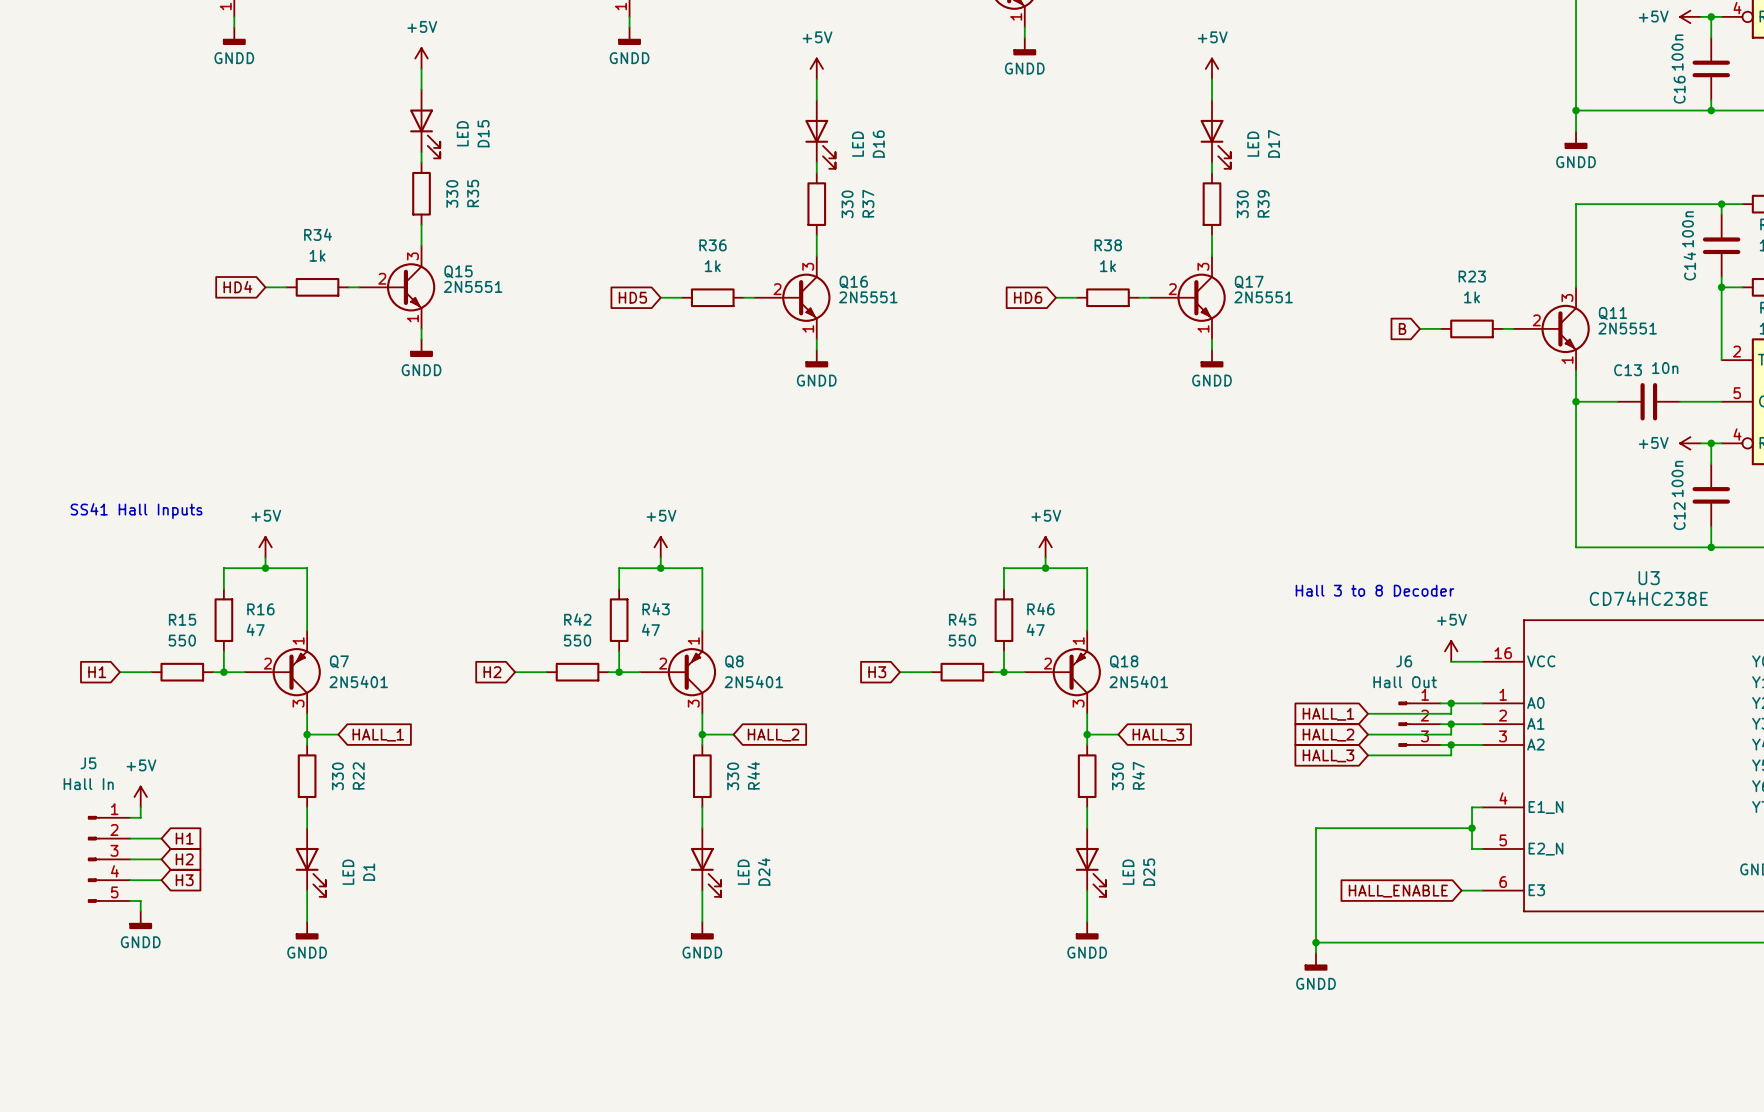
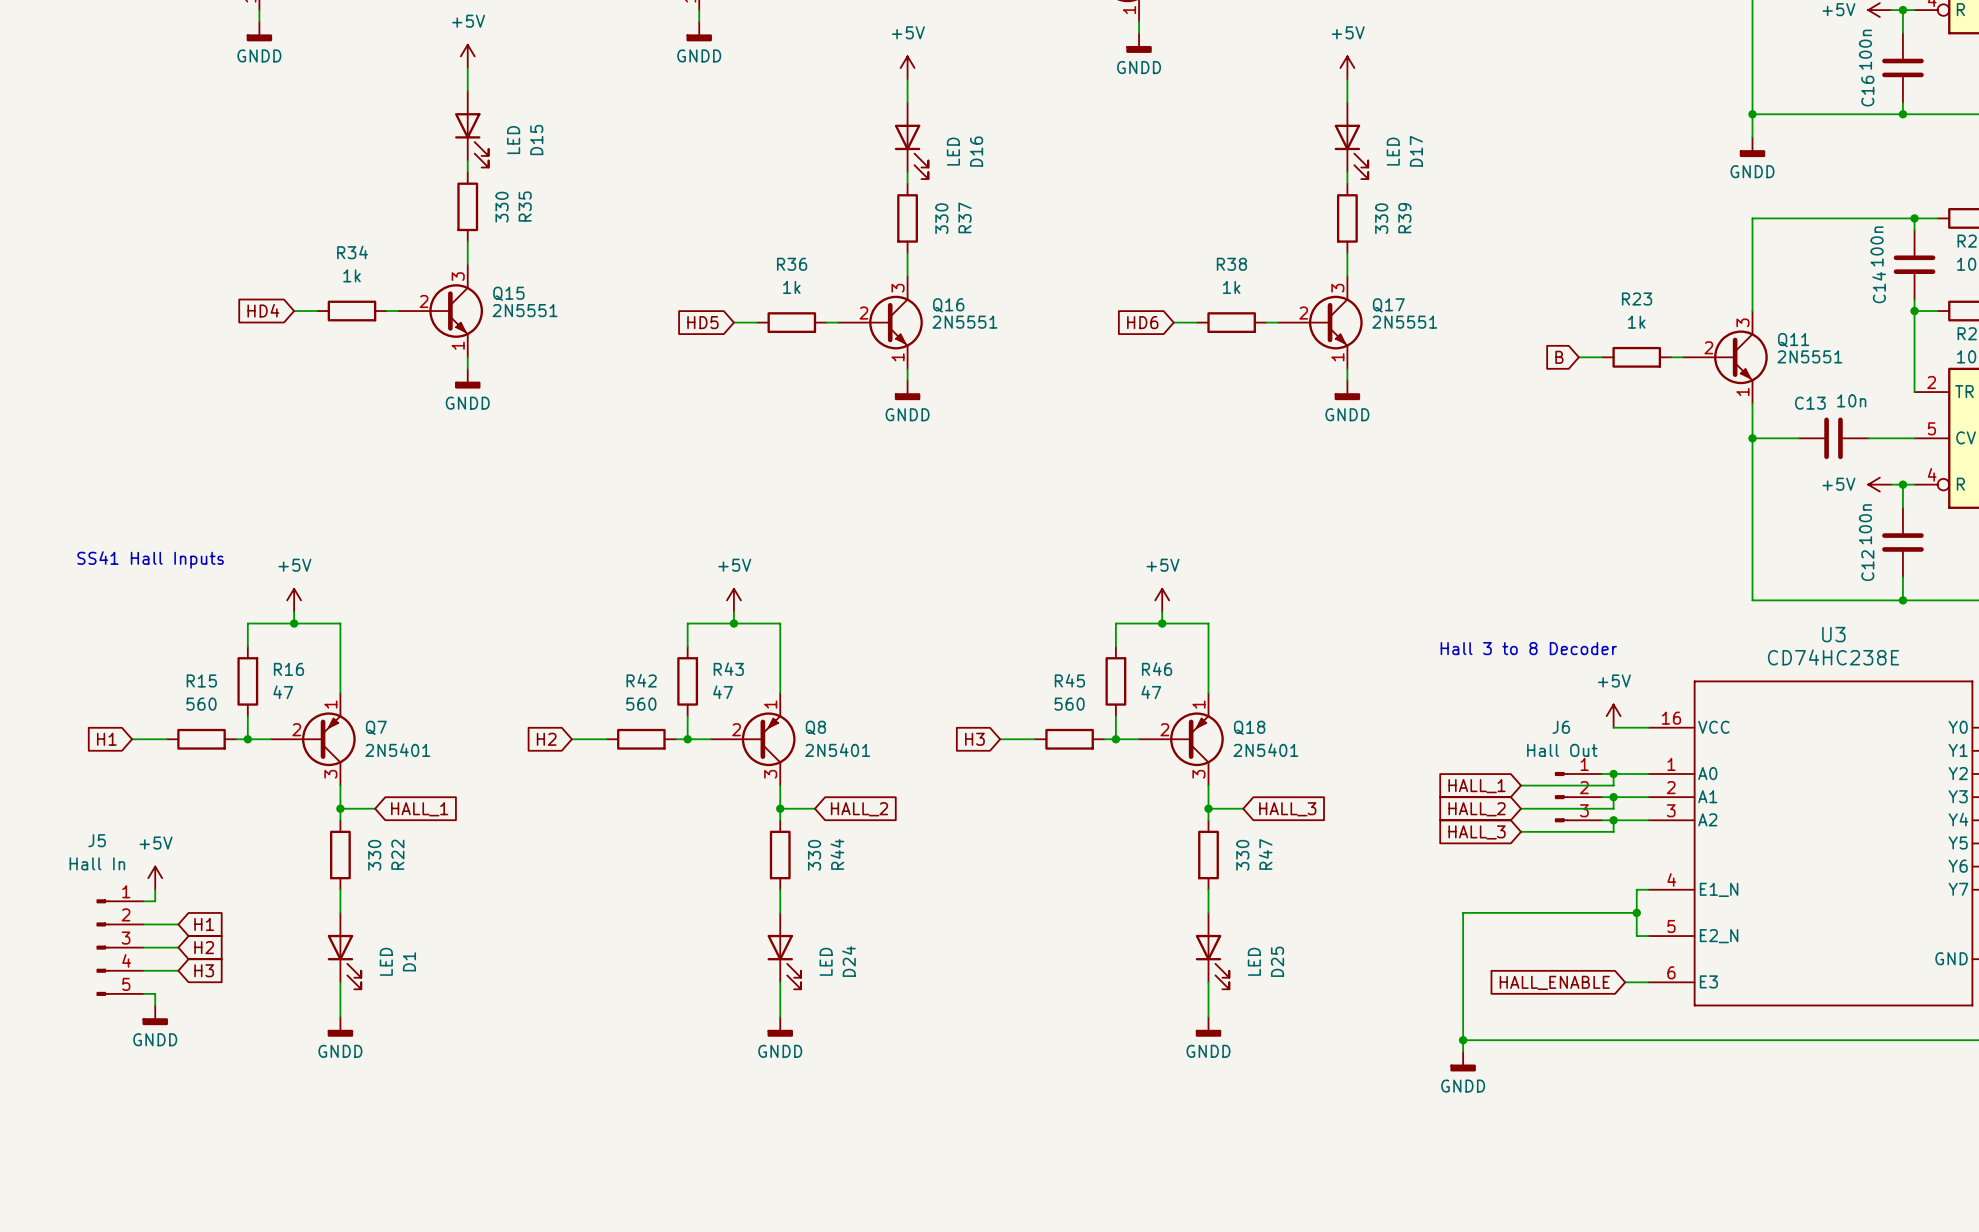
R15 value: 550 (182, 640) -> 560 (201, 704)
R42 value: 550 (577, 640) -> 560 (641, 704)
R45 value: 550 (962, 640) -> 560 (1069, 704)

